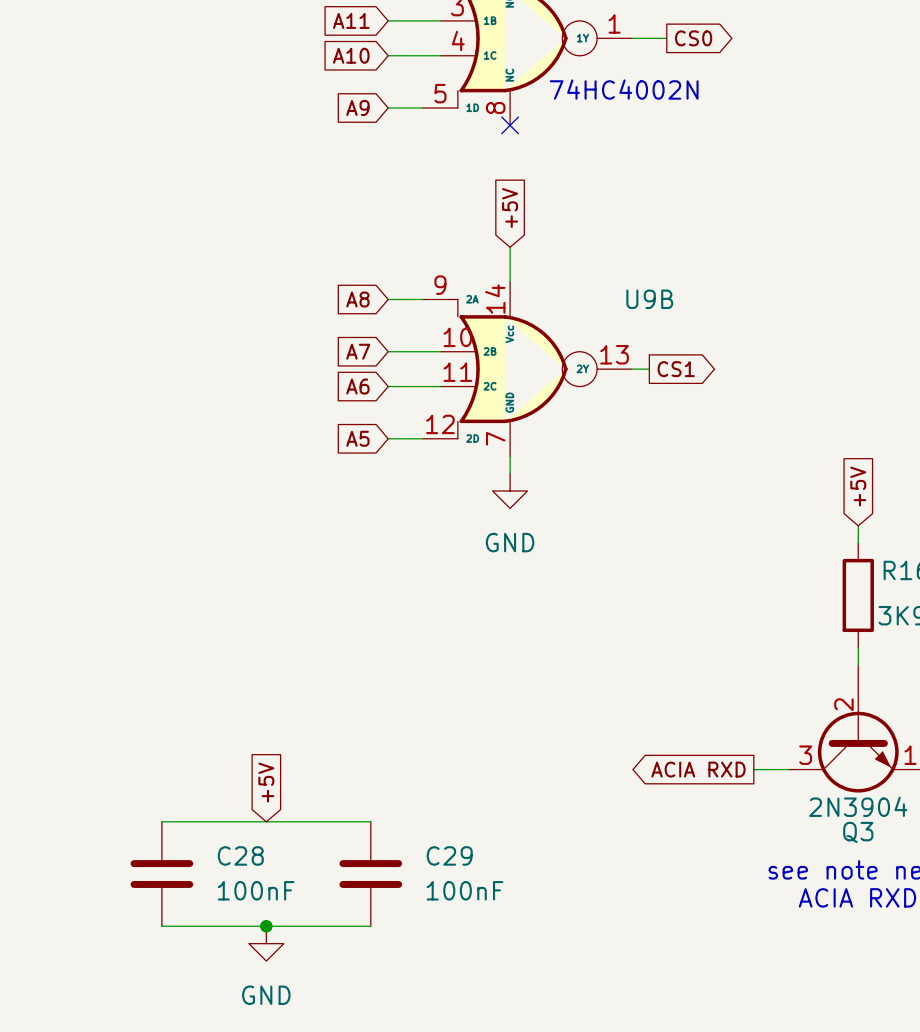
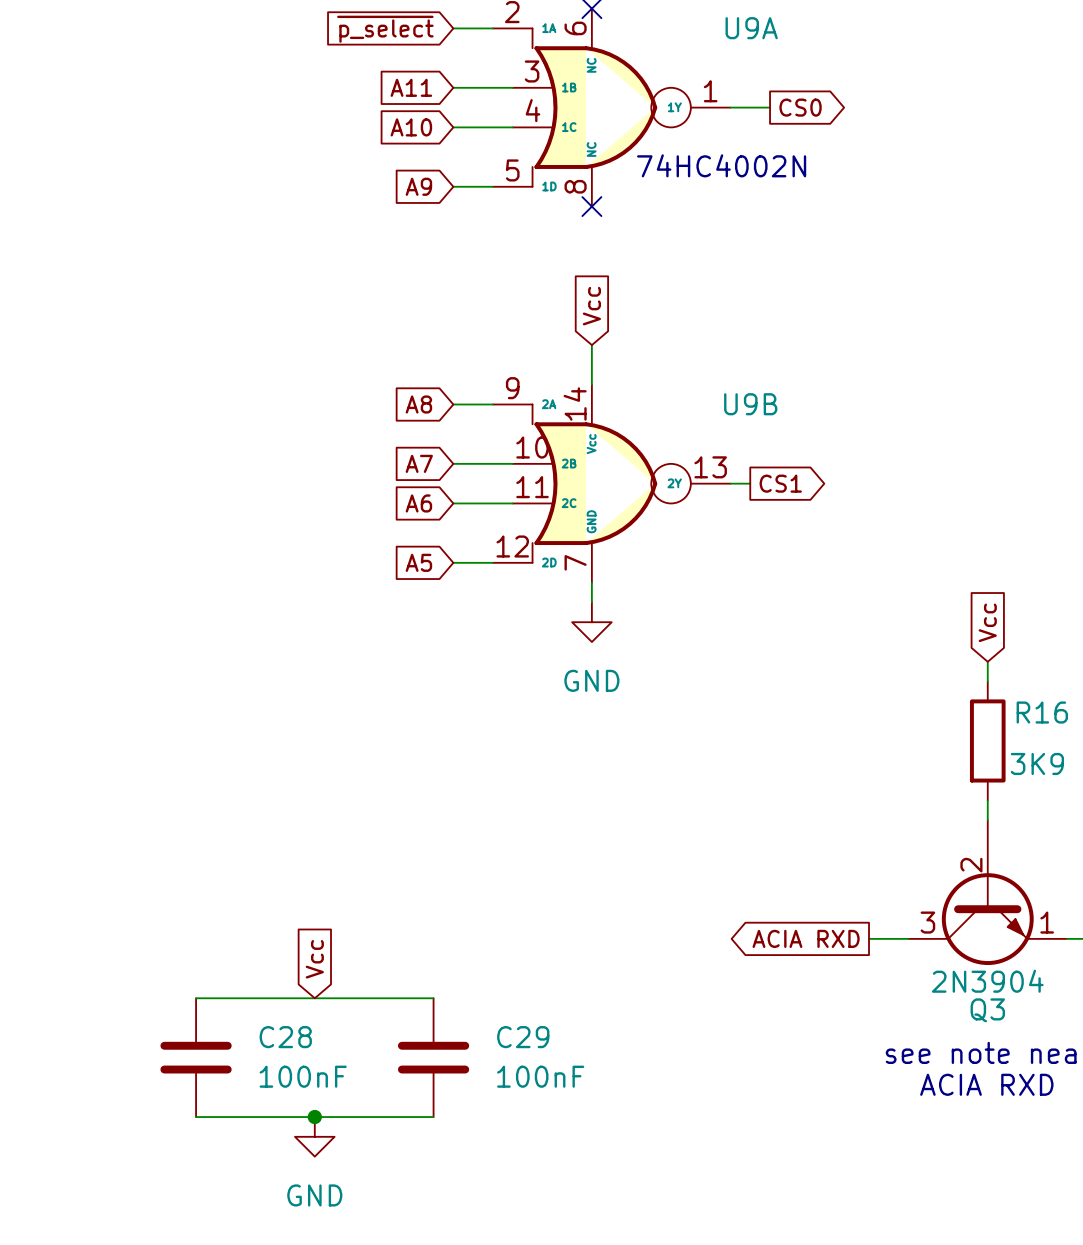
global label: +5V (510, 208) -> Vcc (591, 306)
global label: +5V (858, 486) -> Vcc (987, 622)
global label: +5V (266, 782) -> Vcc (314, 959)

